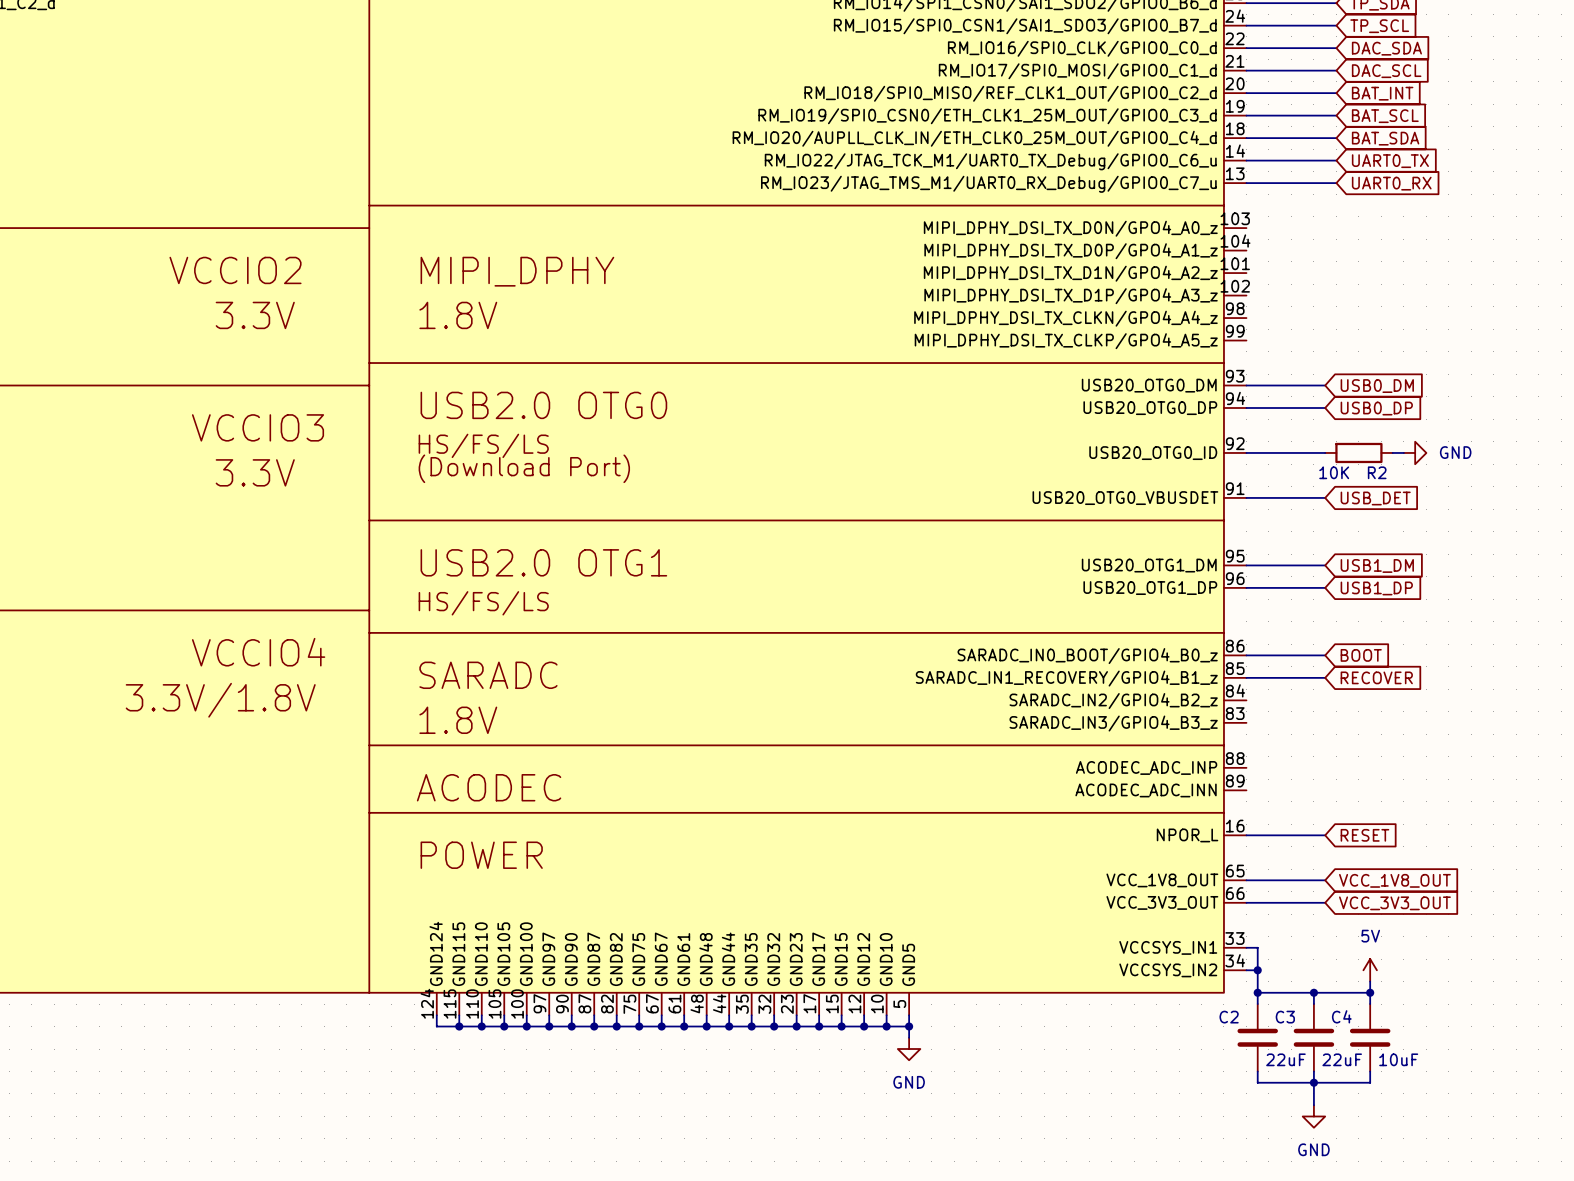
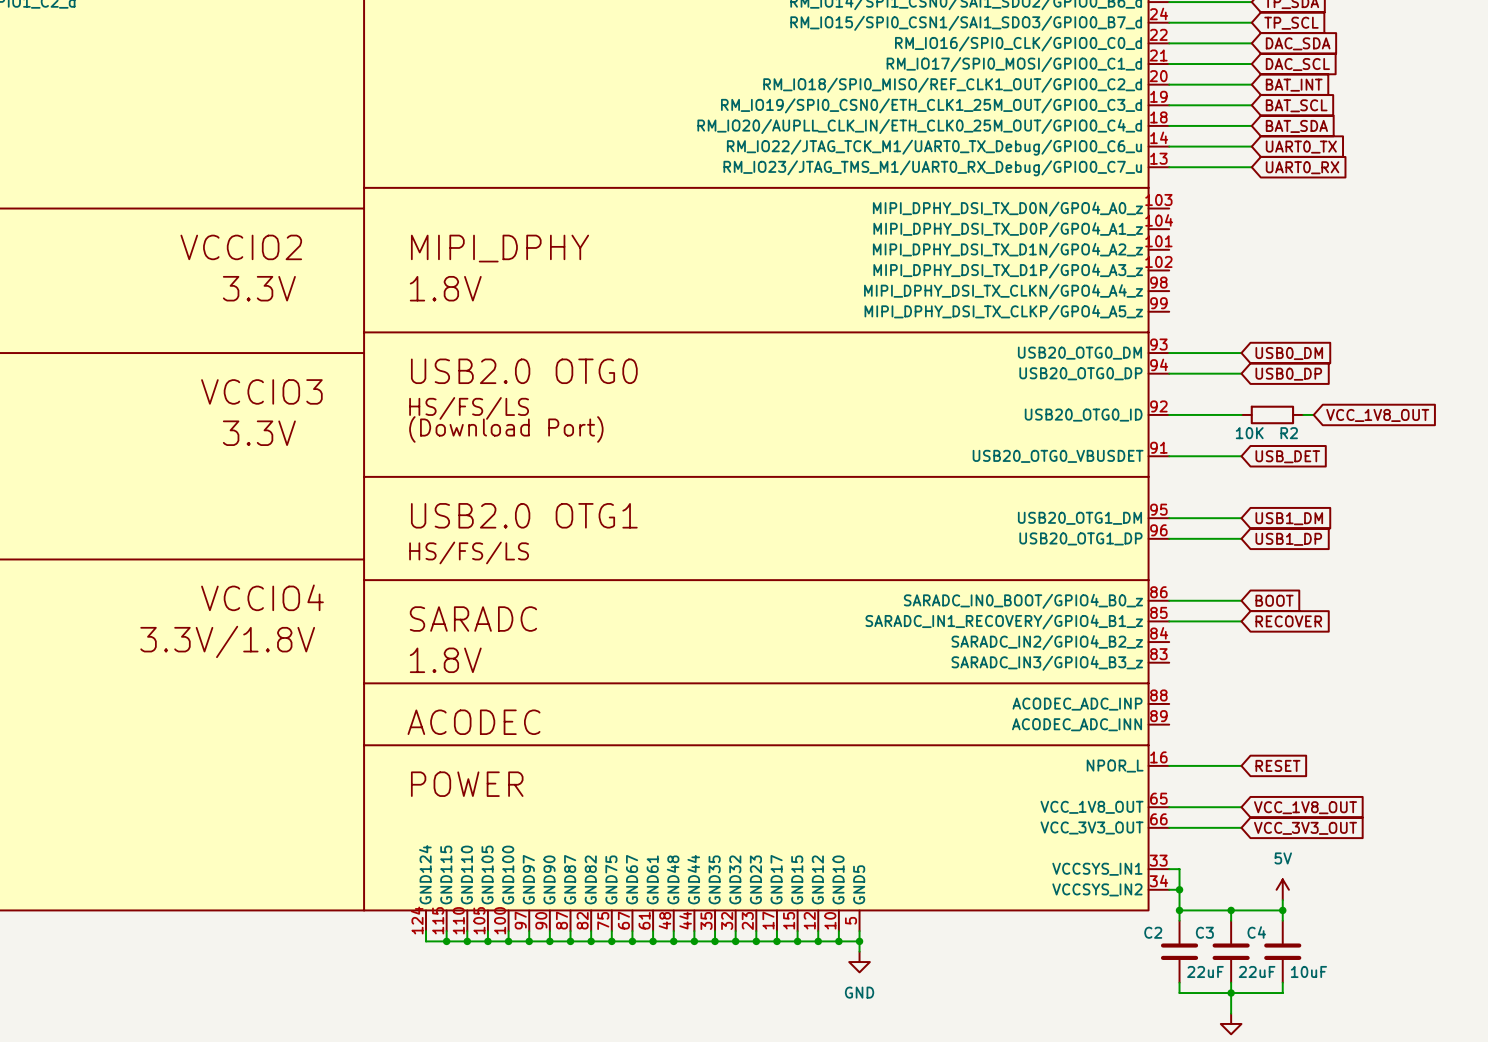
power symbol: GND (1415, 452) -> none
global label: none -> VCC_1V8_OUT (1377, 415)

